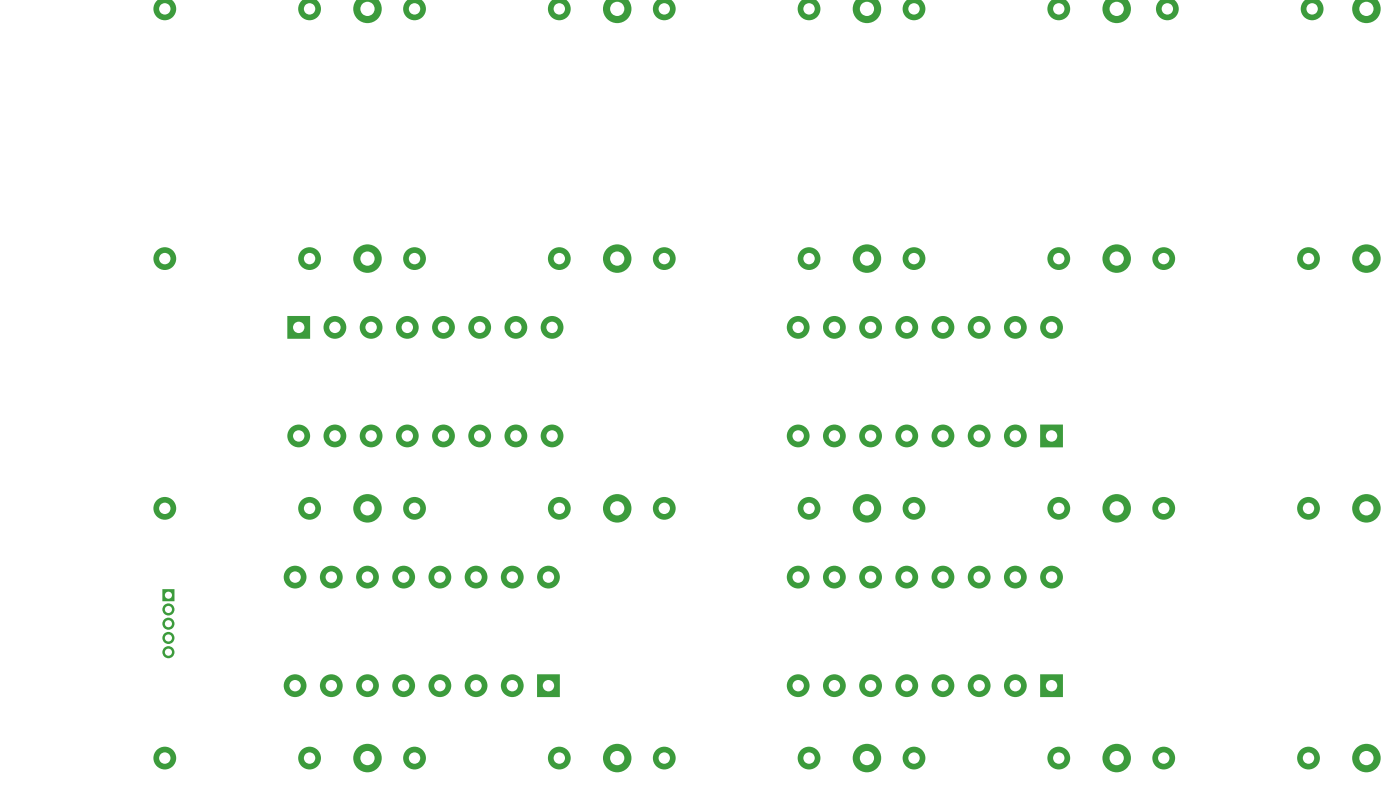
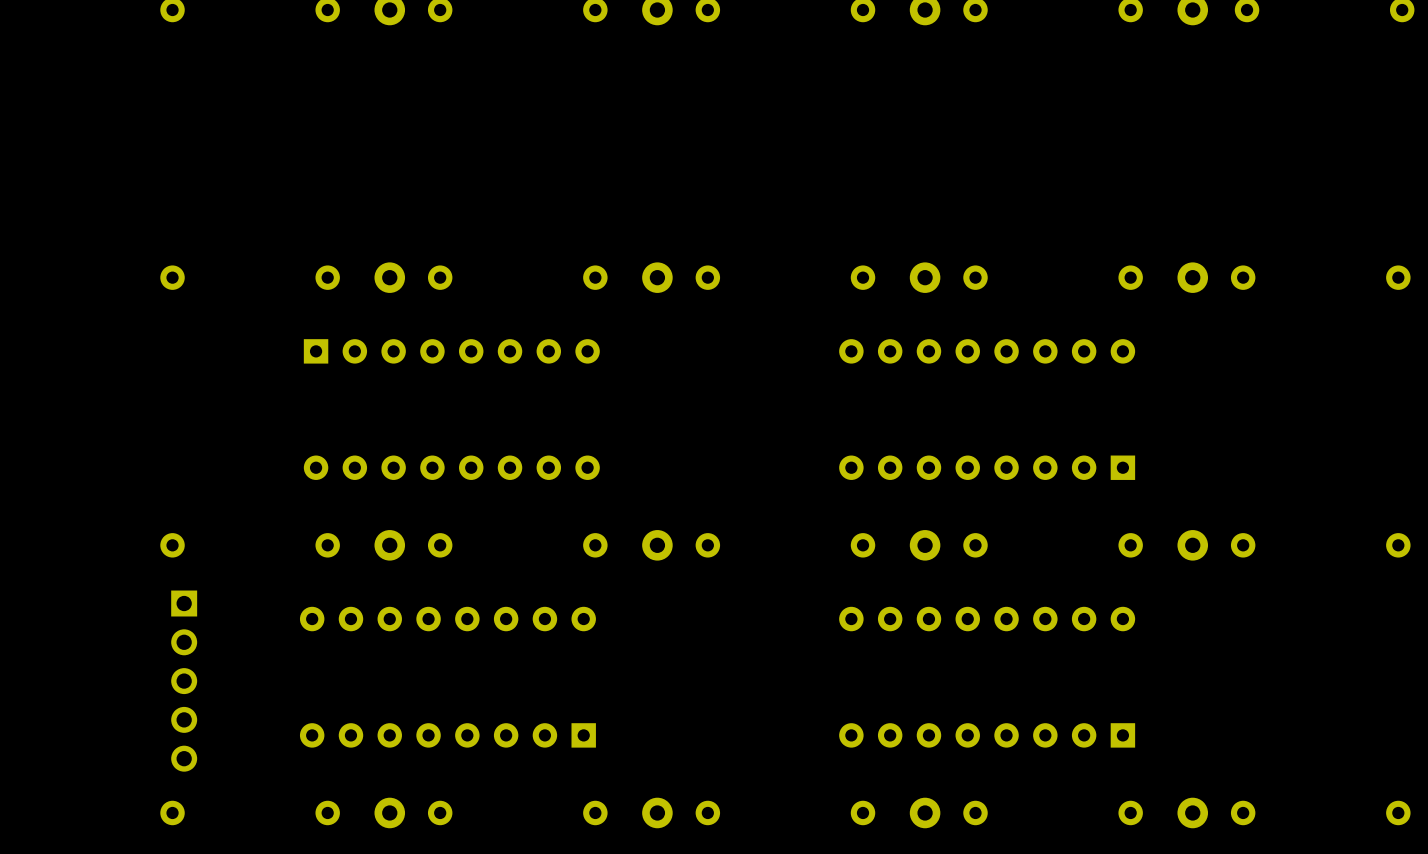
part footprint: [162, 589, 175, 659] -> [171, 590, 198, 772]

